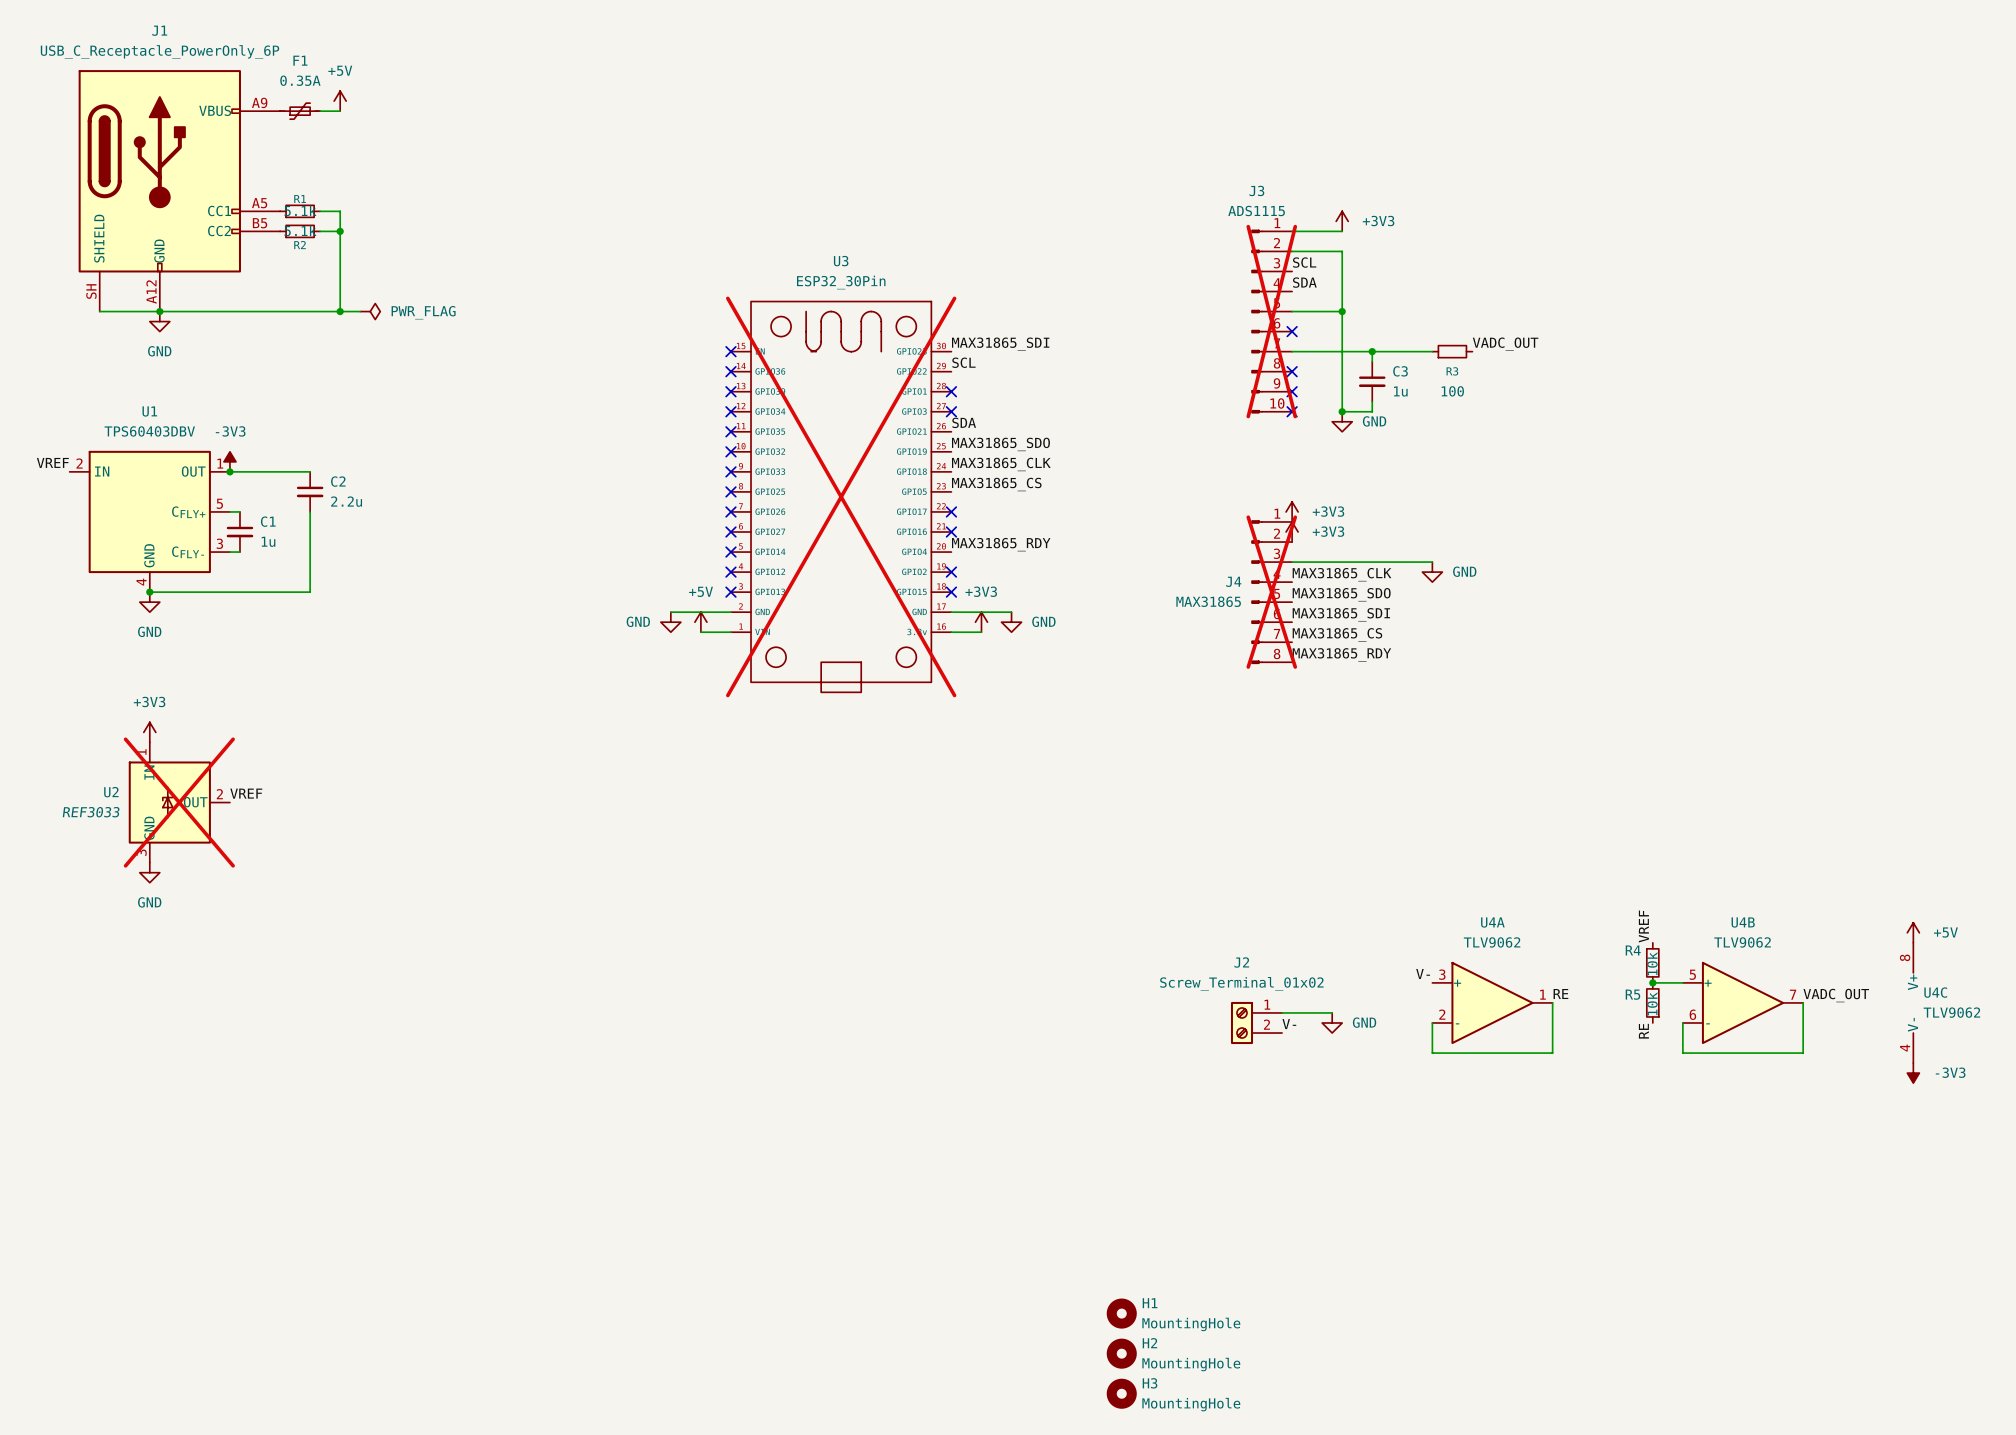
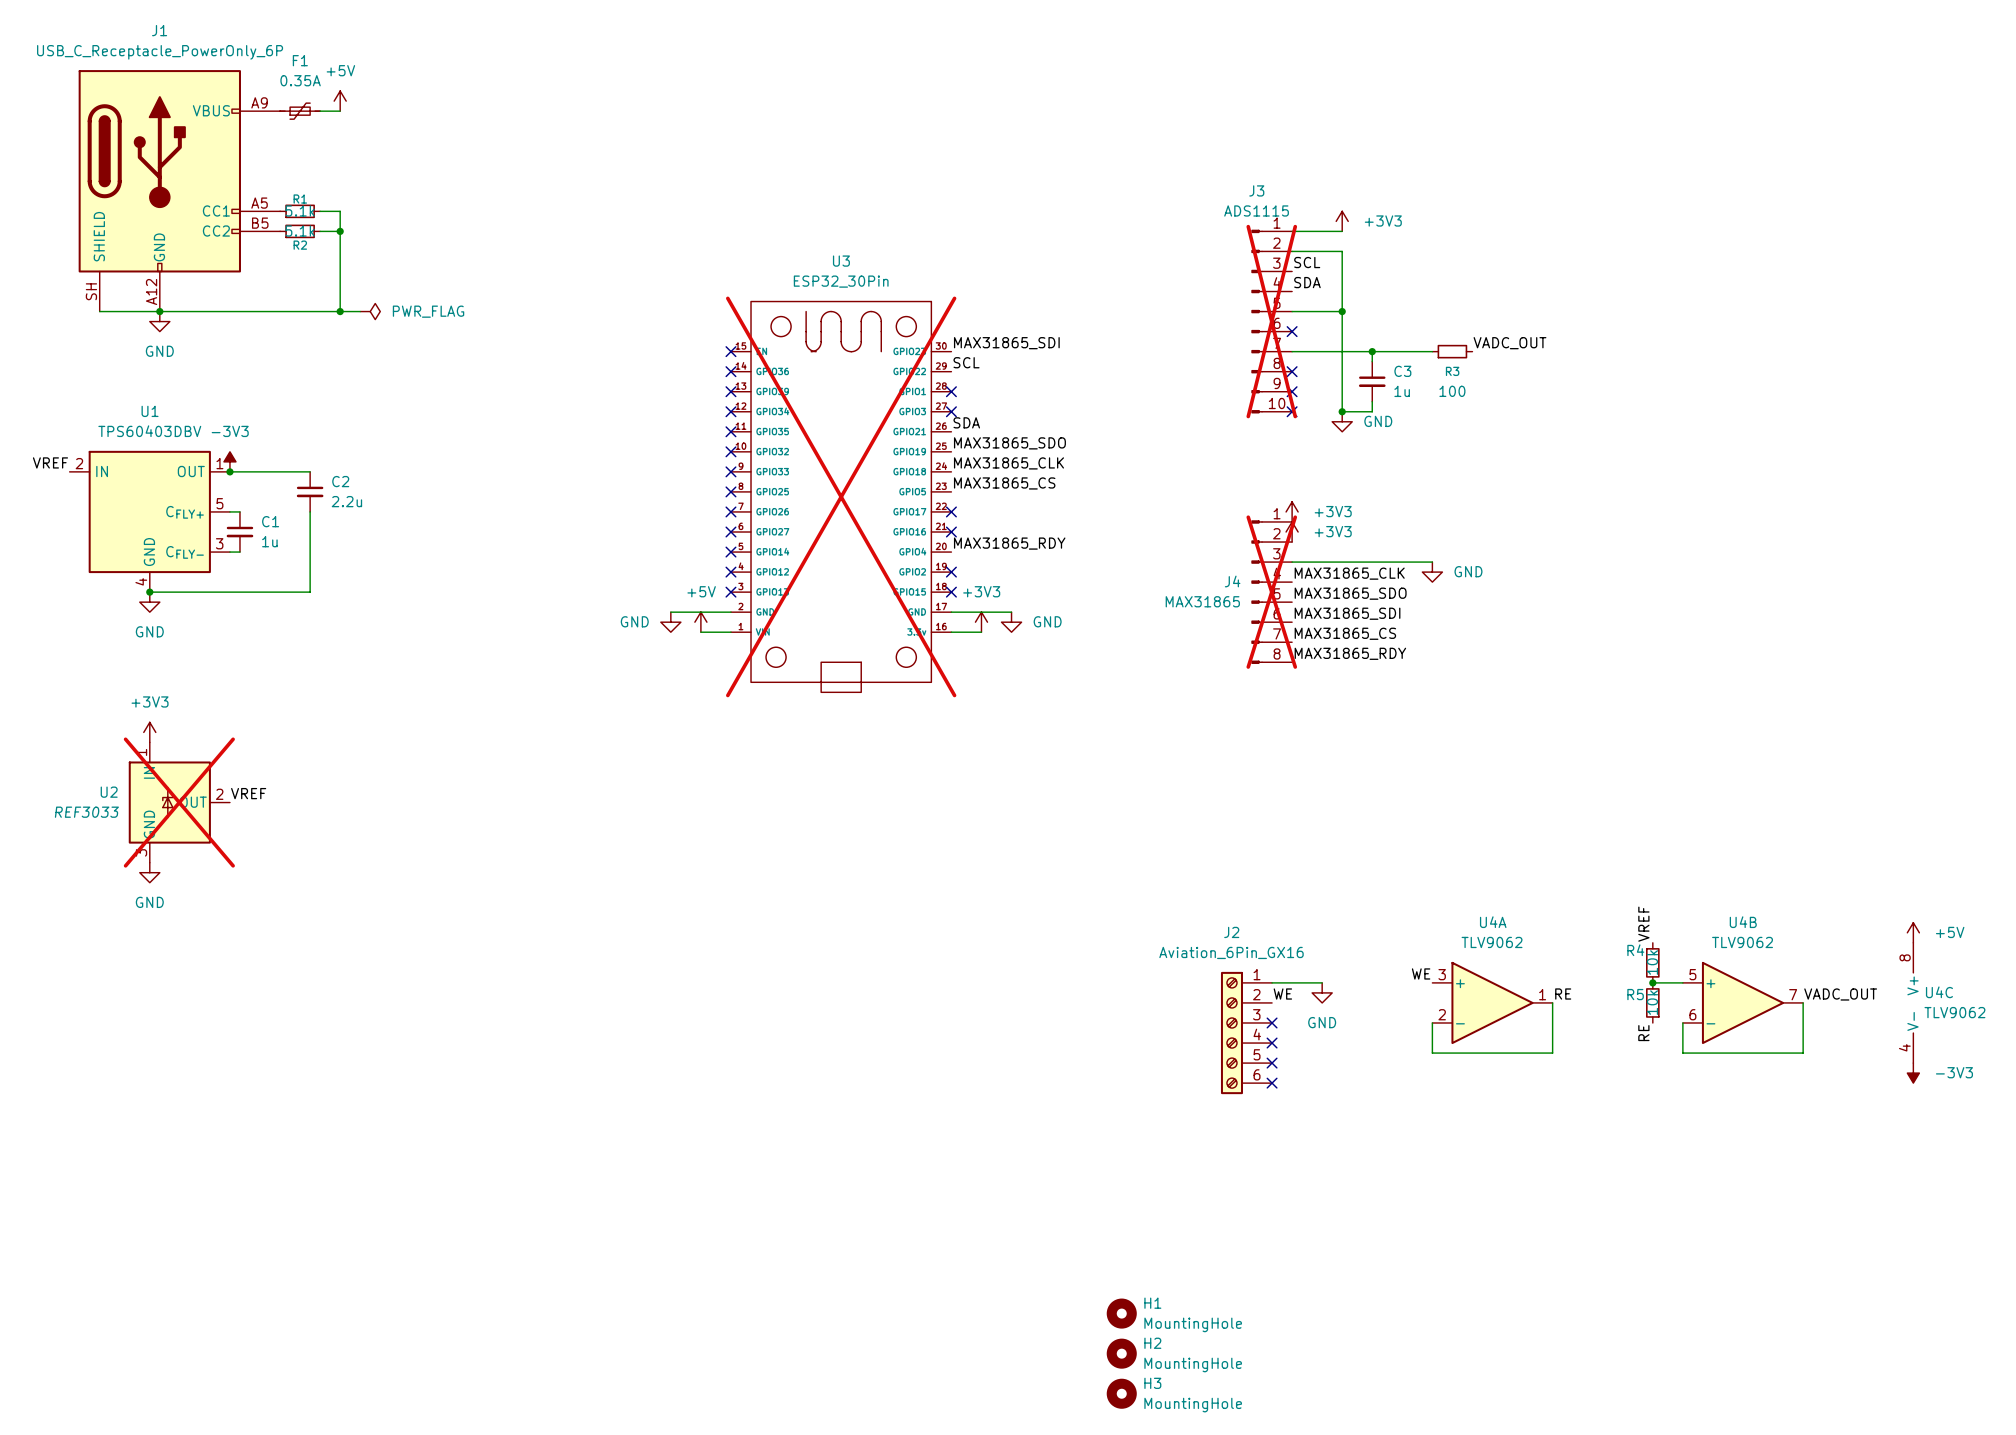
J2 name position: J2 (1241, 962) -> J2 (1231, 932)
label: V- (1423, 973) -> WE (1421, 973)
J2 value: Screw_Terminal_01x02 (1241, 983) -> Aviation_6Pin_GX16 (1231, 952)
label: none -> WE (1282, 994)
J2 symbol: [1230, 1001, 1283, 1045] -> [1220, 971, 1273, 1095]
wire: (1282, 1012) (1332, 1012) -> (1272, 982) (1322, 982)
no-connect mark: none -> (1272, 1022)
power symbol position: GND (1332, 1022) -> GND (1322, 992)
power symbol text position: GND (1364, 1022) -> GND (1322, 1022)
label: V- (1289, 1024) -> none
no-connect mark: none -> (1272, 1043)
no-connect mark: none -> (1272, 1063)
no-connect mark: none -> (1272, 1083)

